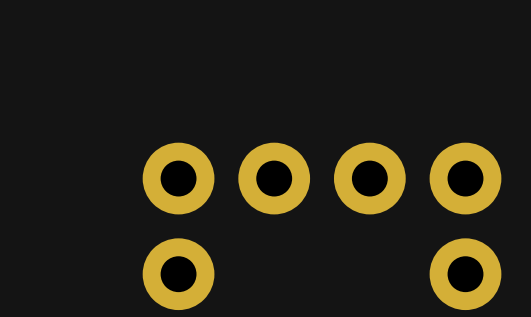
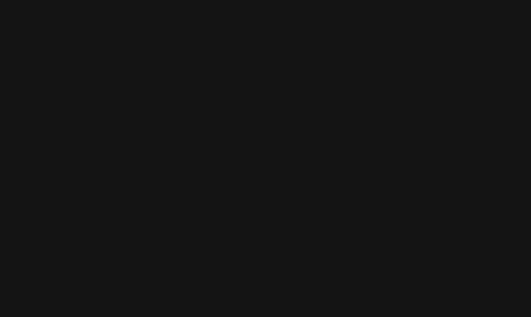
part: (178, 178) -> none
part: (274, 178) -> none
part: (369, 178) -> none
part: (465, 178) -> none
part: (178, 274) -> none
part: (465, 274) -> none

